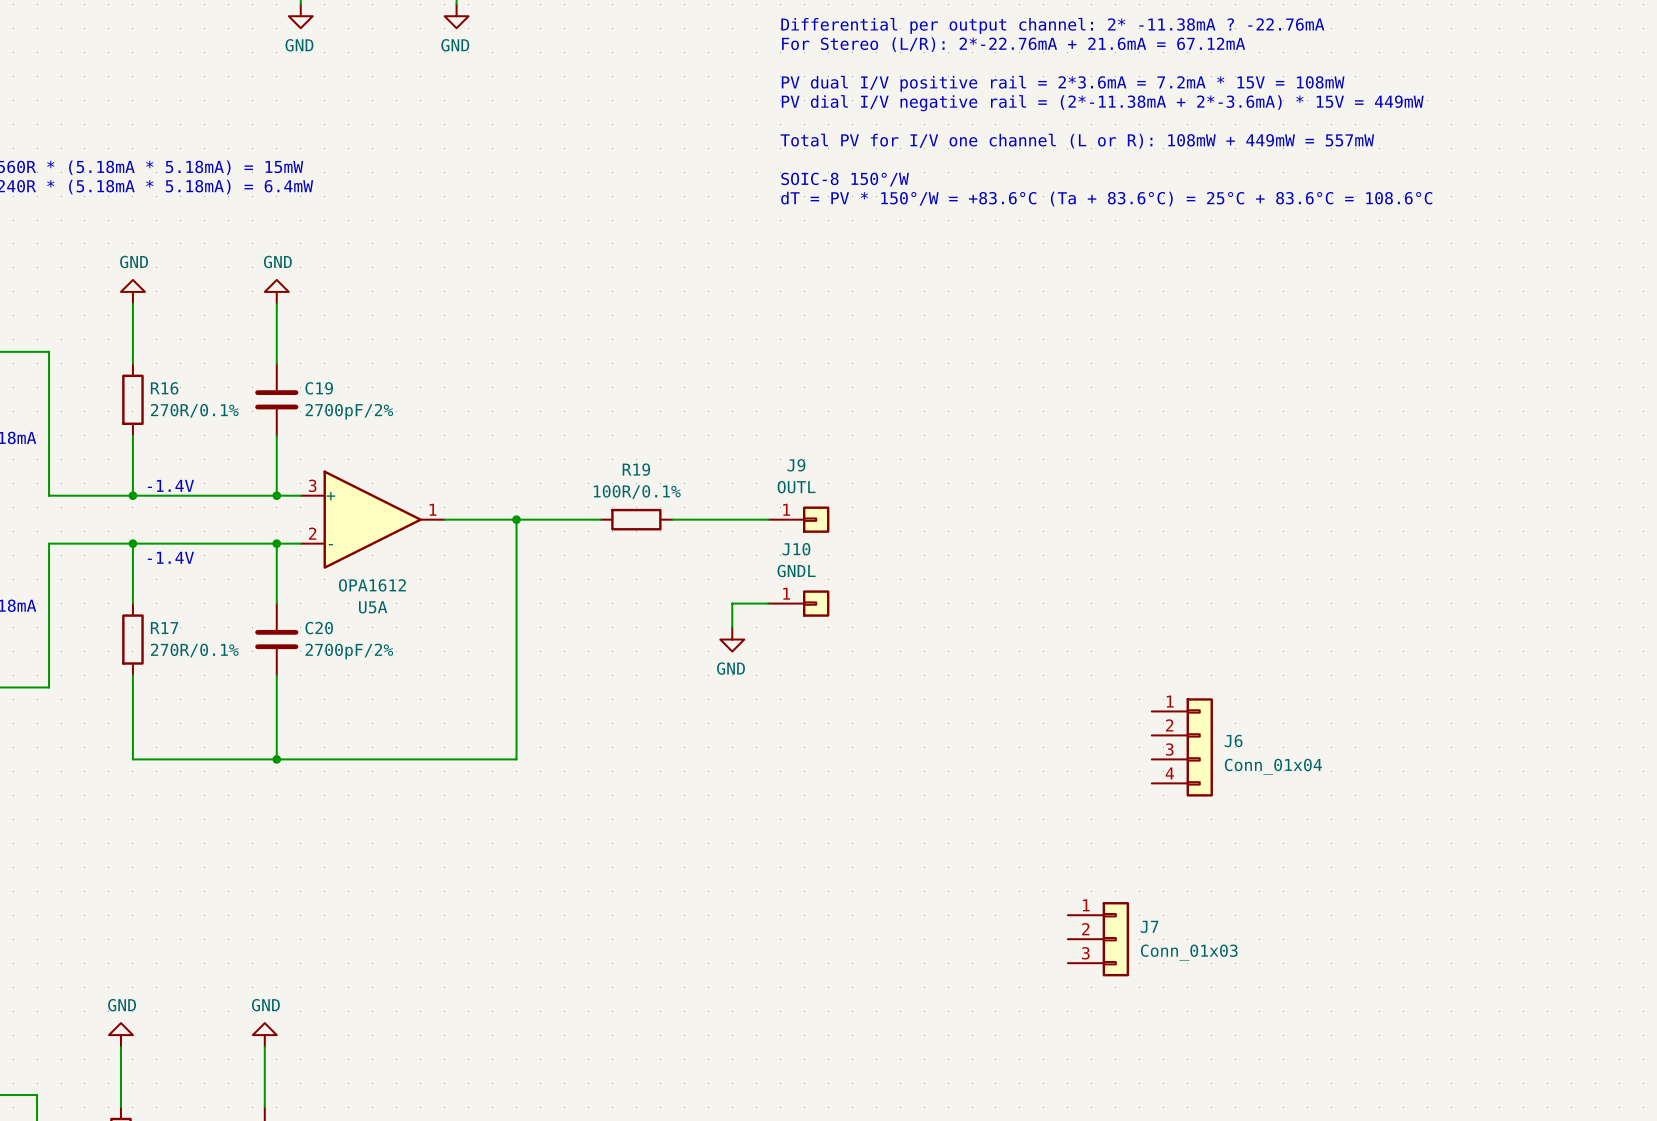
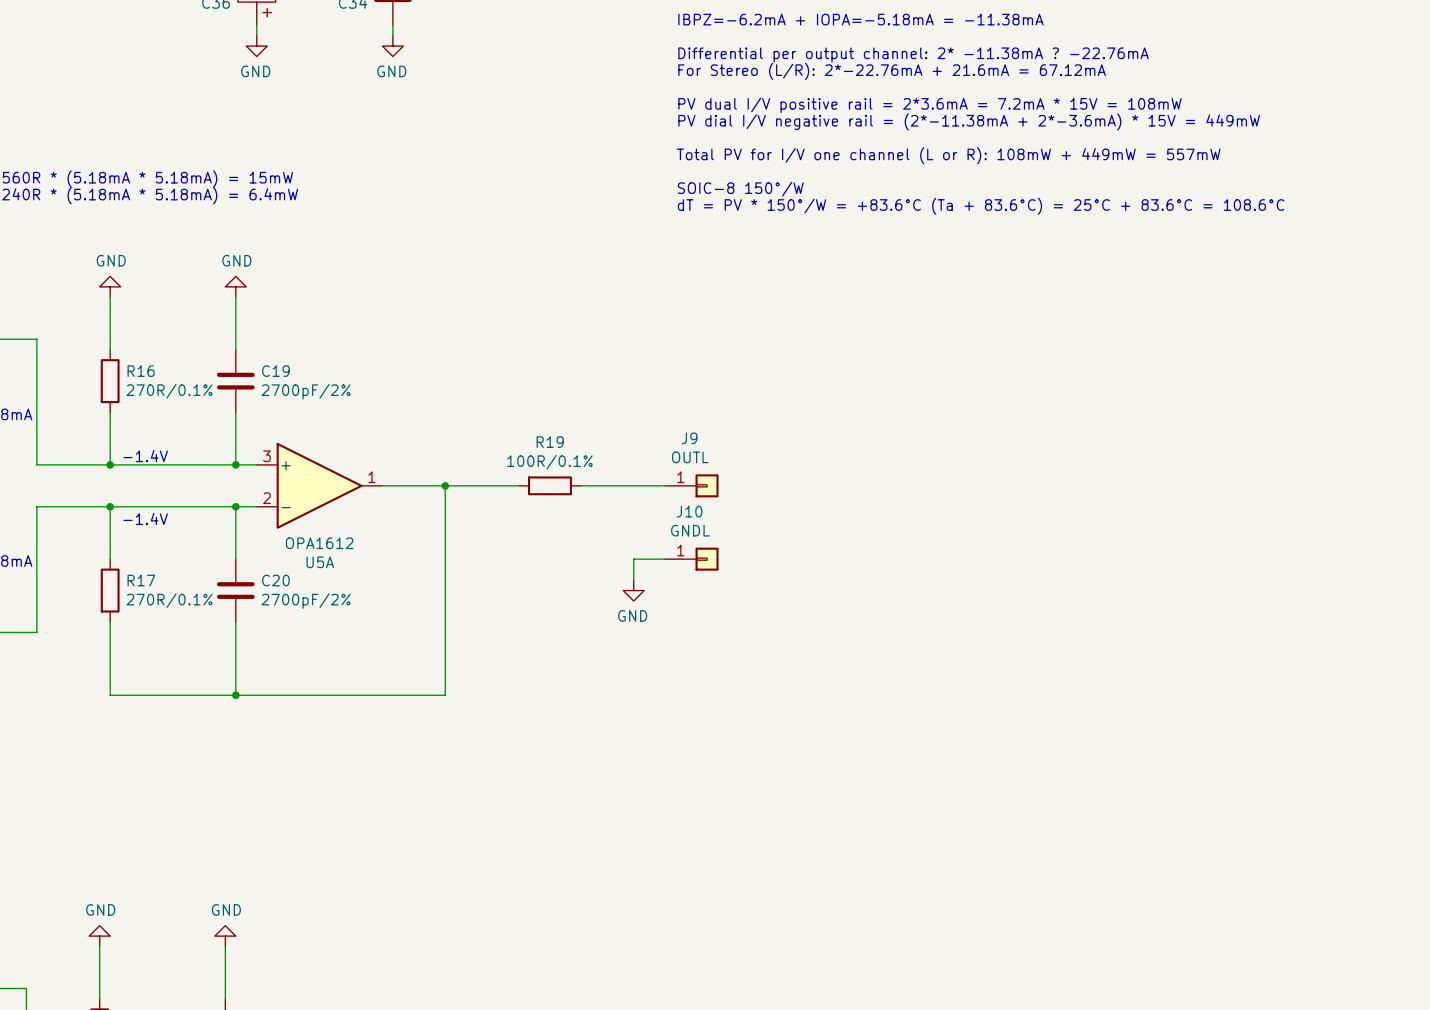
J6: Conn_01x04 (1182, 747) -> none
J7: Conn_01x03 (1098, 939) -> none

